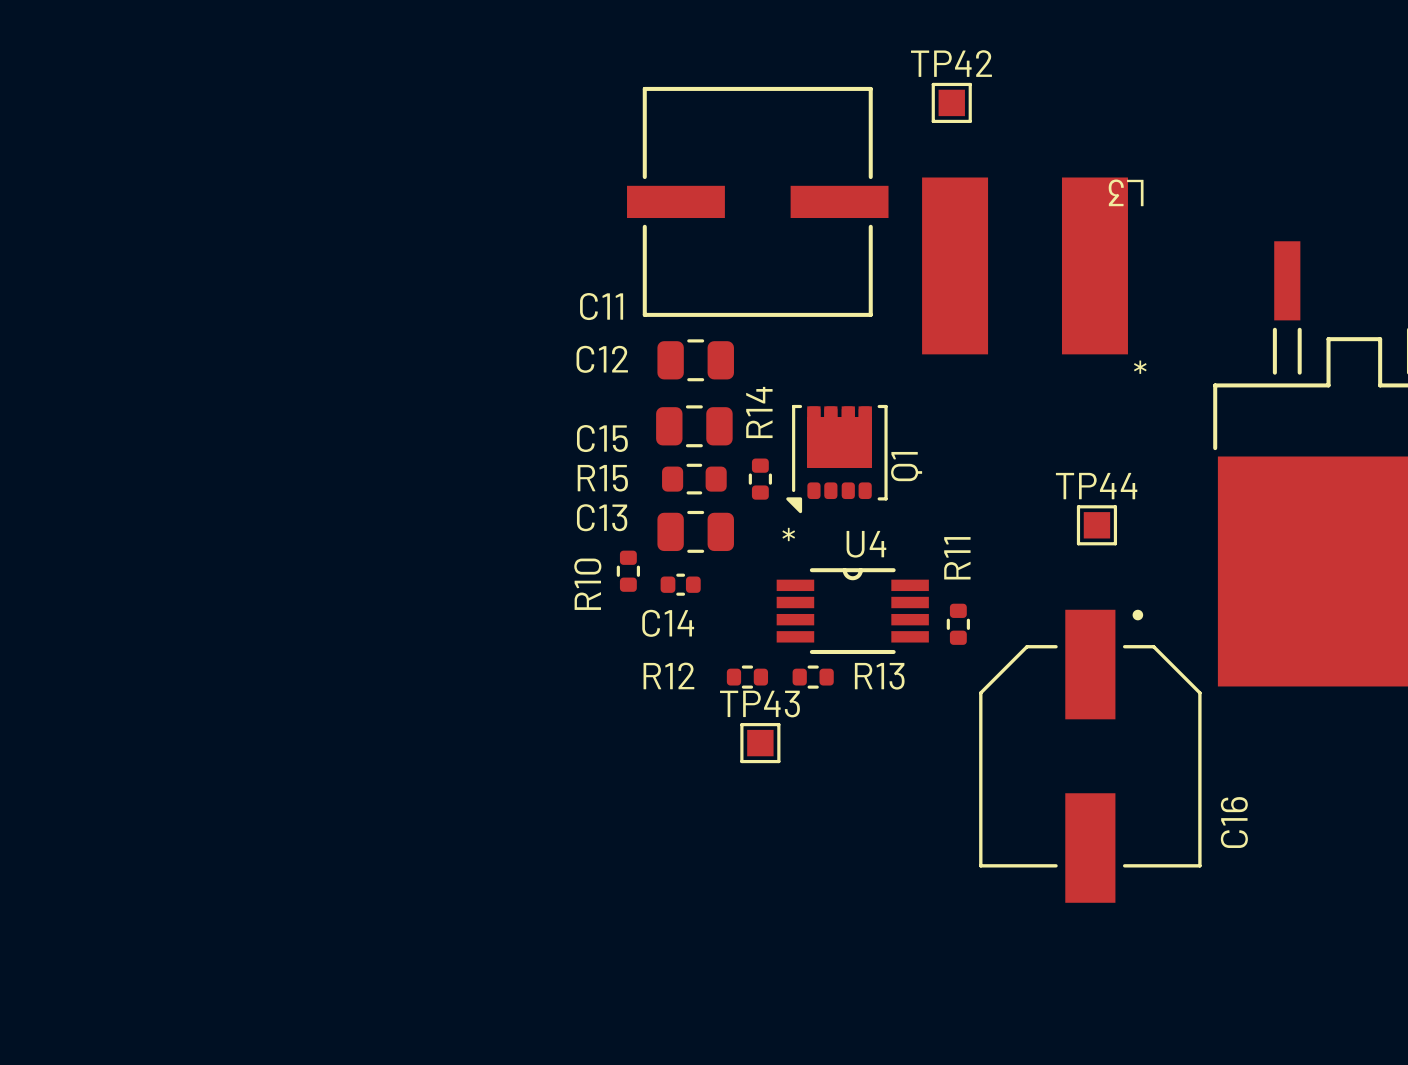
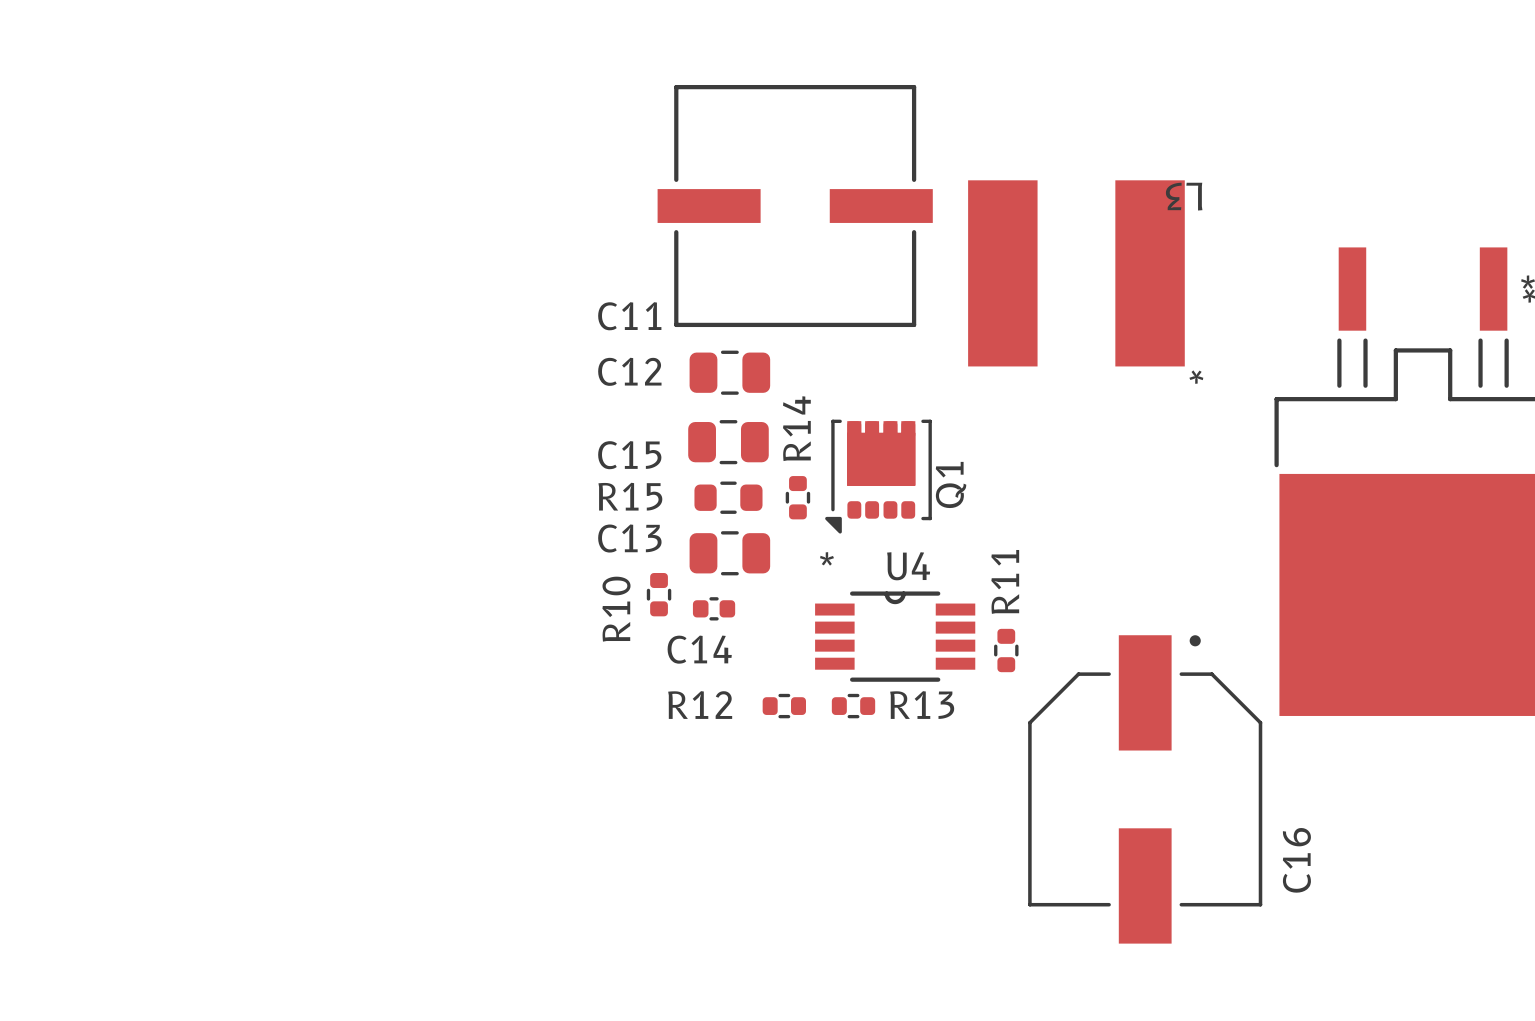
TP42: (951, 102) -> none
TP44: (1096, 525) -> none
TP43: (760, 743) -> none

